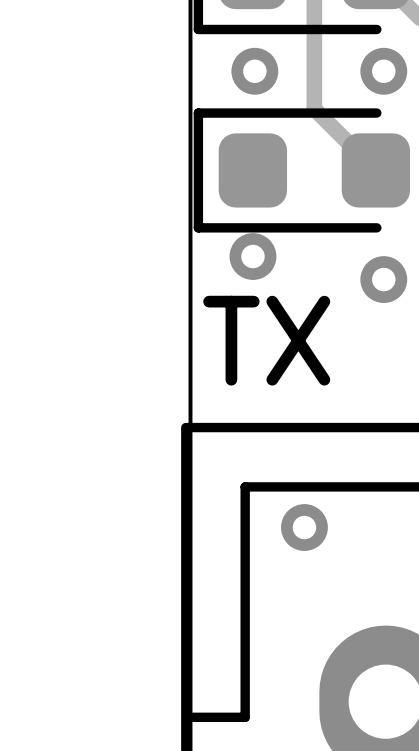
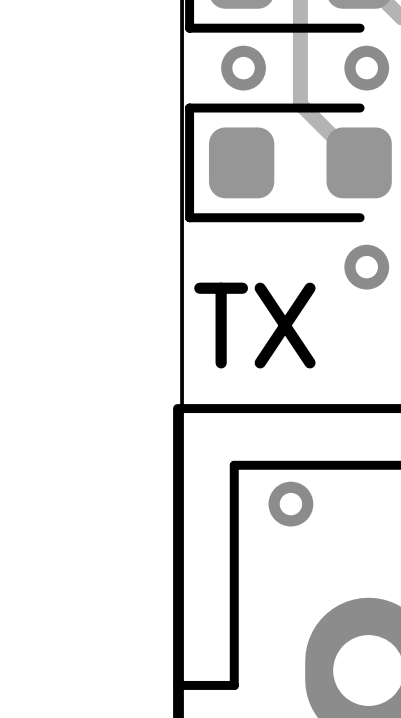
via: (252, 256) -> none

